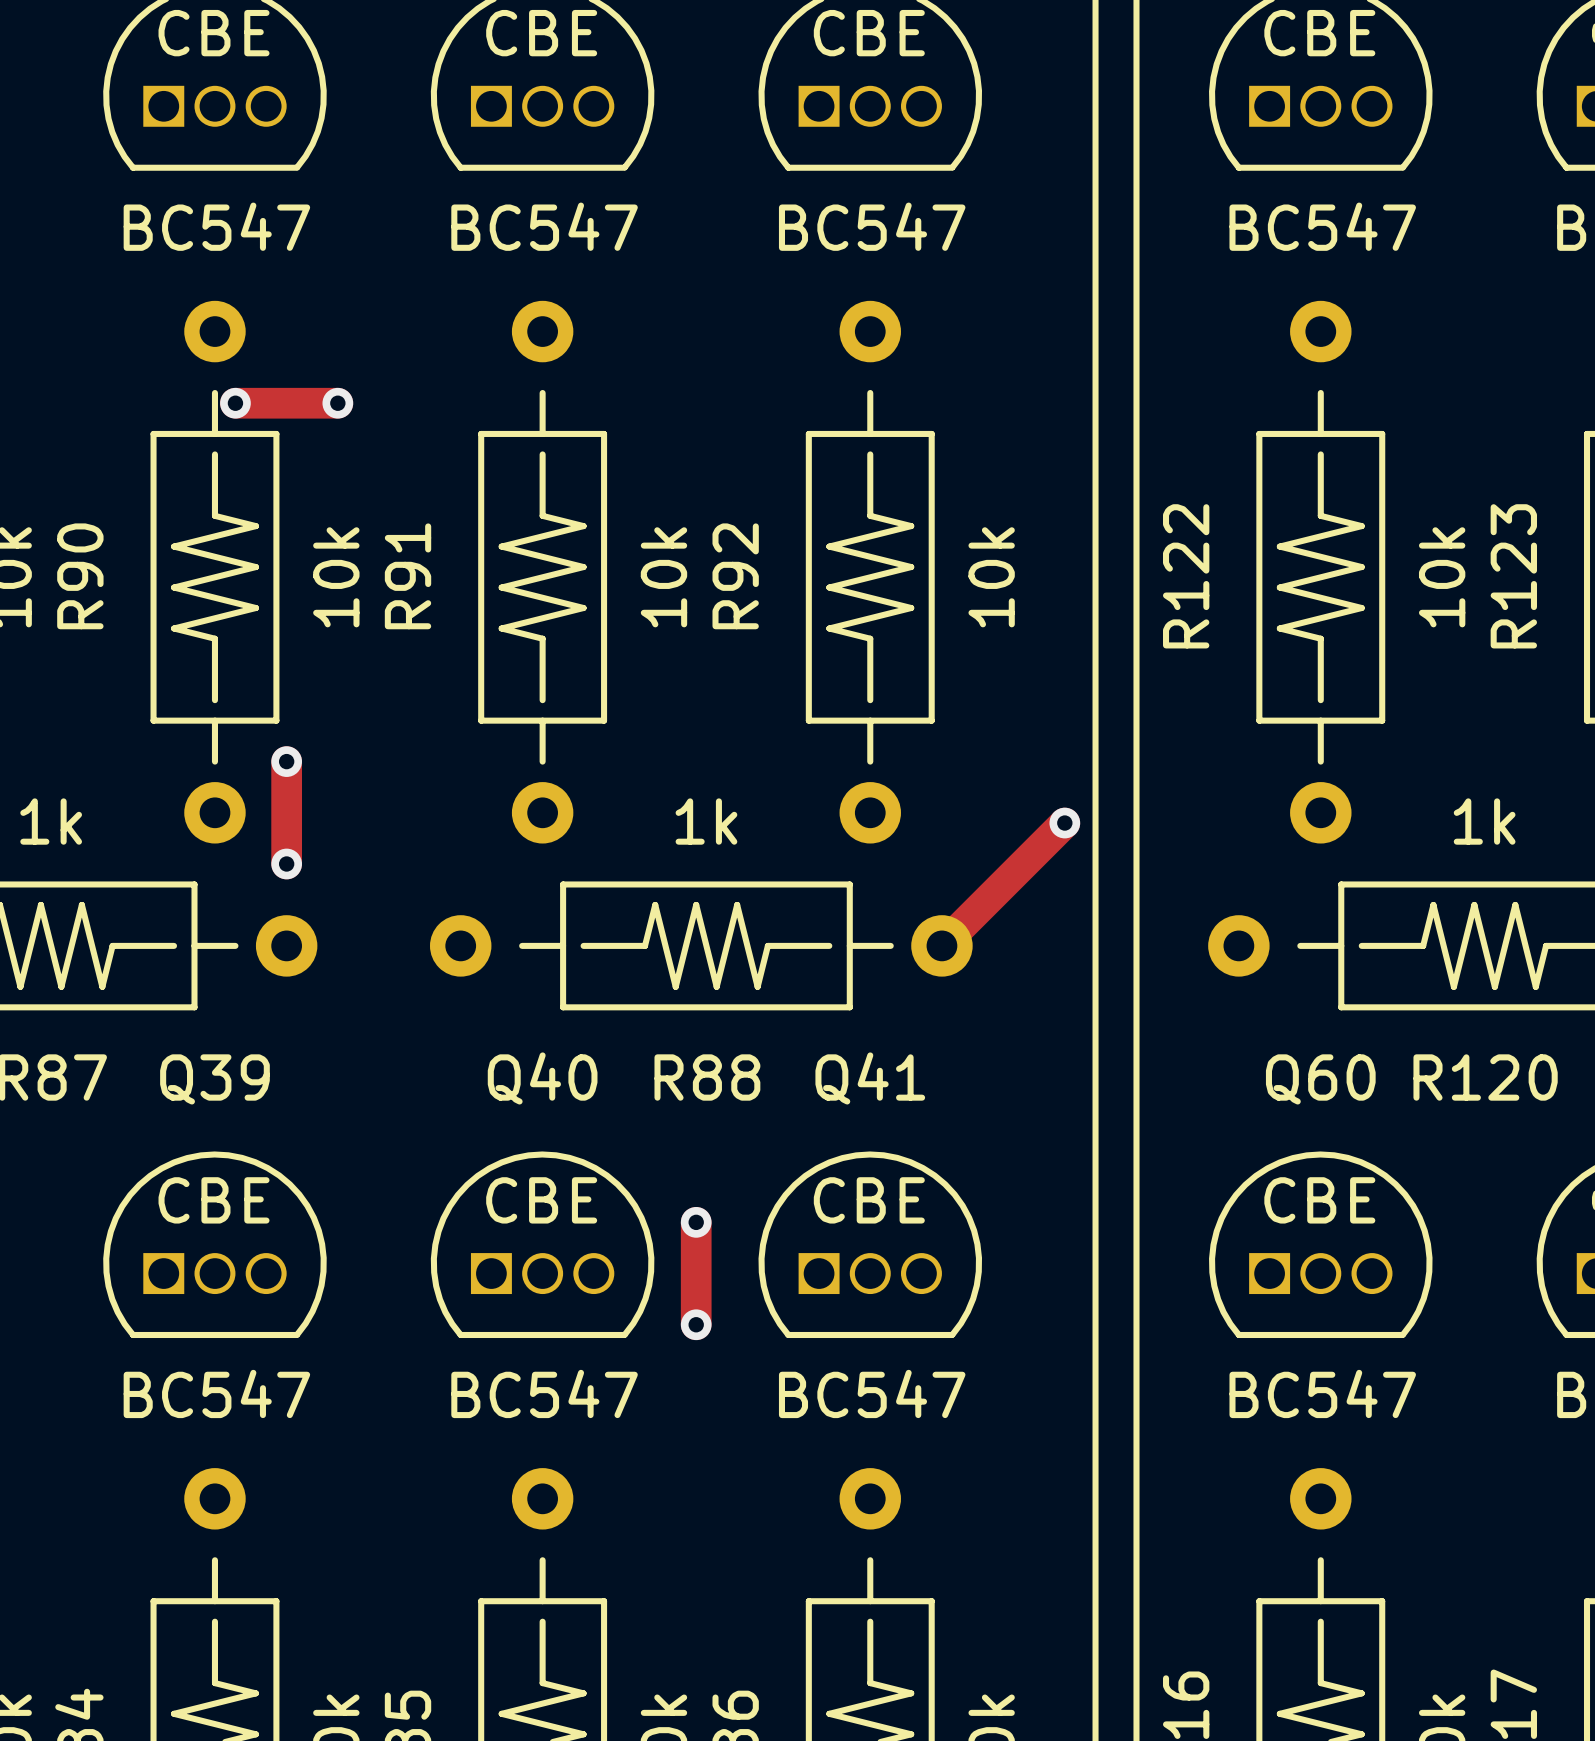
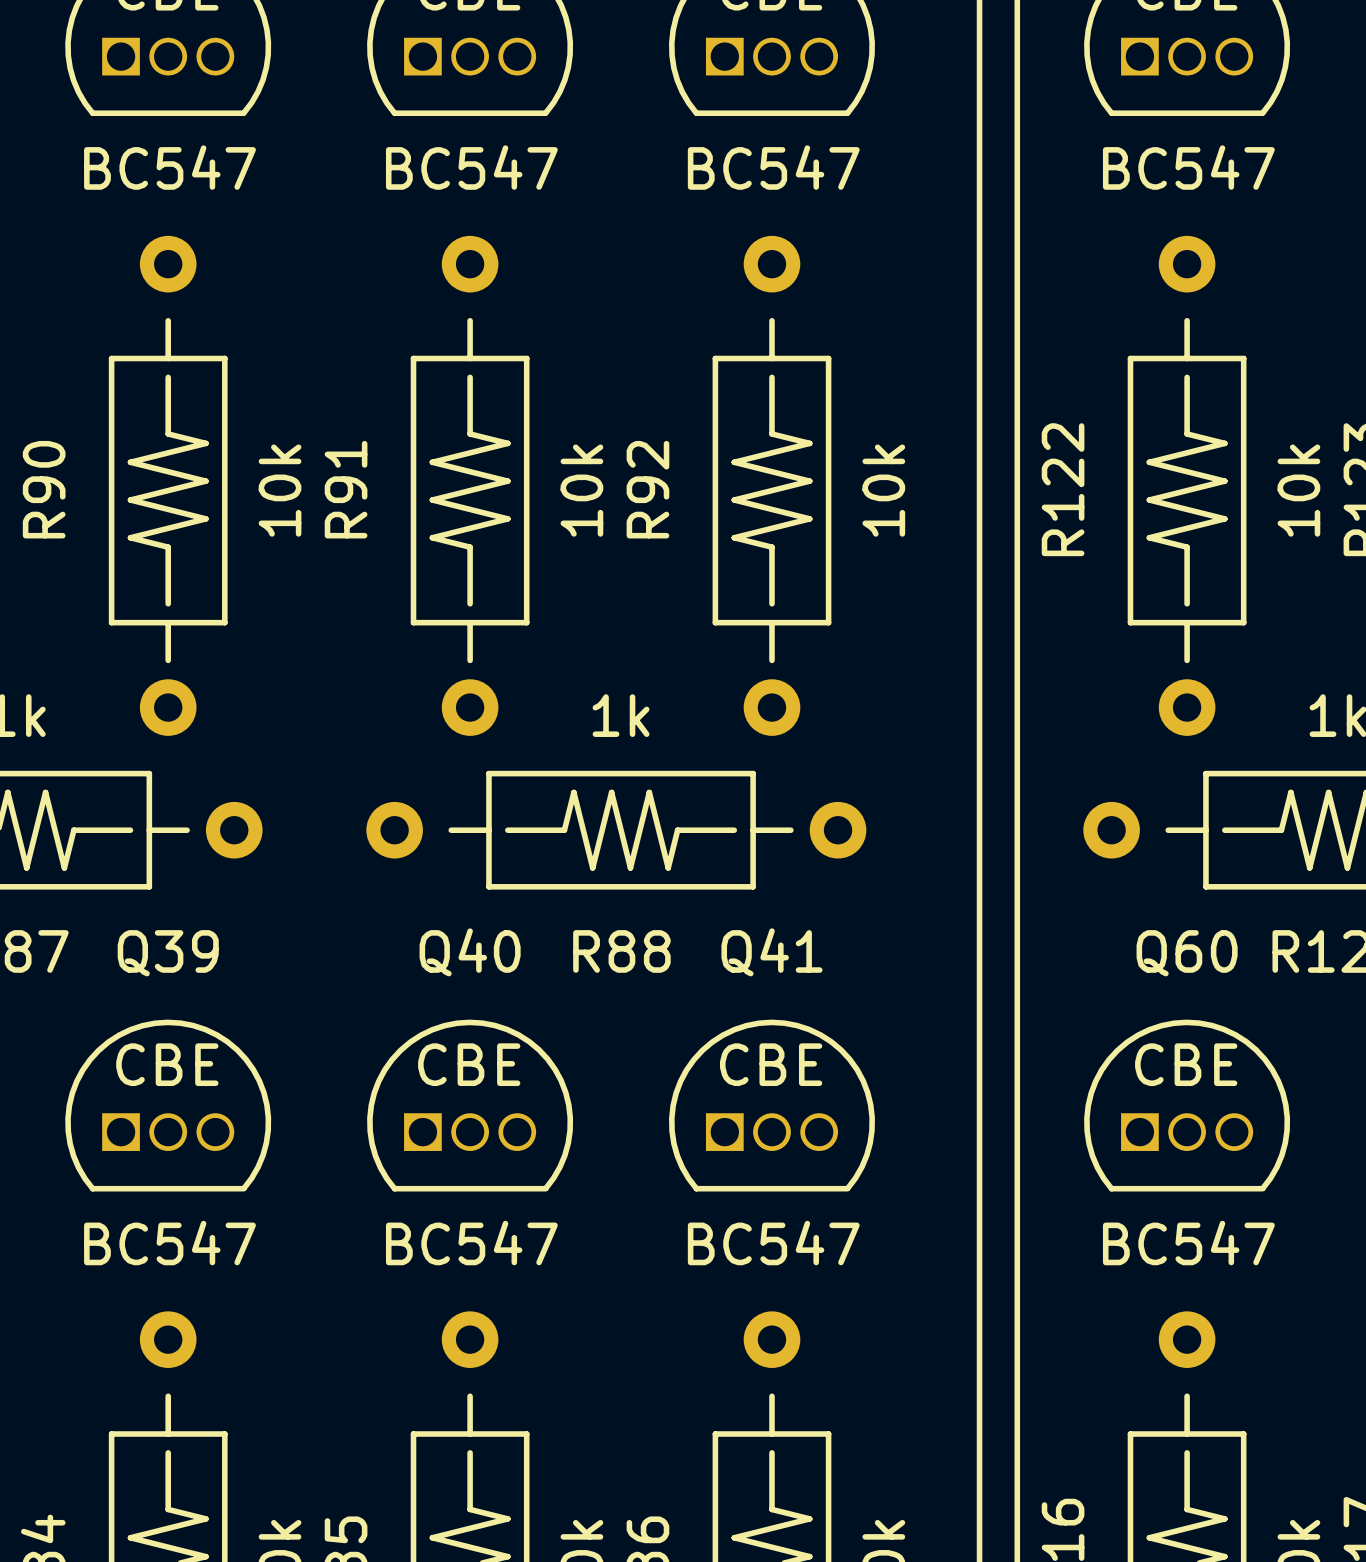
track: (235, 403) (337, 403) -> none
via: (235, 403) -> none
via: (337, 403) -> none
track: (286, 761) (286, 863) -> none
via: (286, 761) -> none
track: (1064, 823) (941, 945) -> none
via: (1064, 823) -> none
via: (286, 863) -> none
track: (696, 1222) (696, 1324) -> none
via: (696, 1222) -> none
via: (696, 1324) -> none

